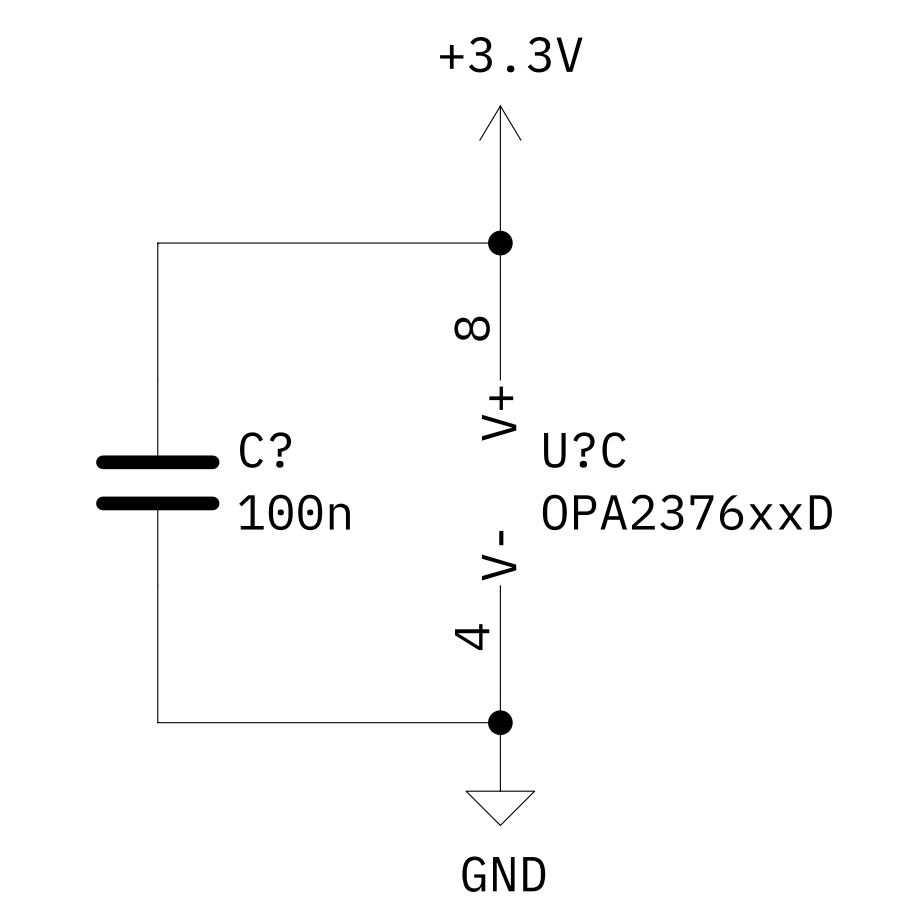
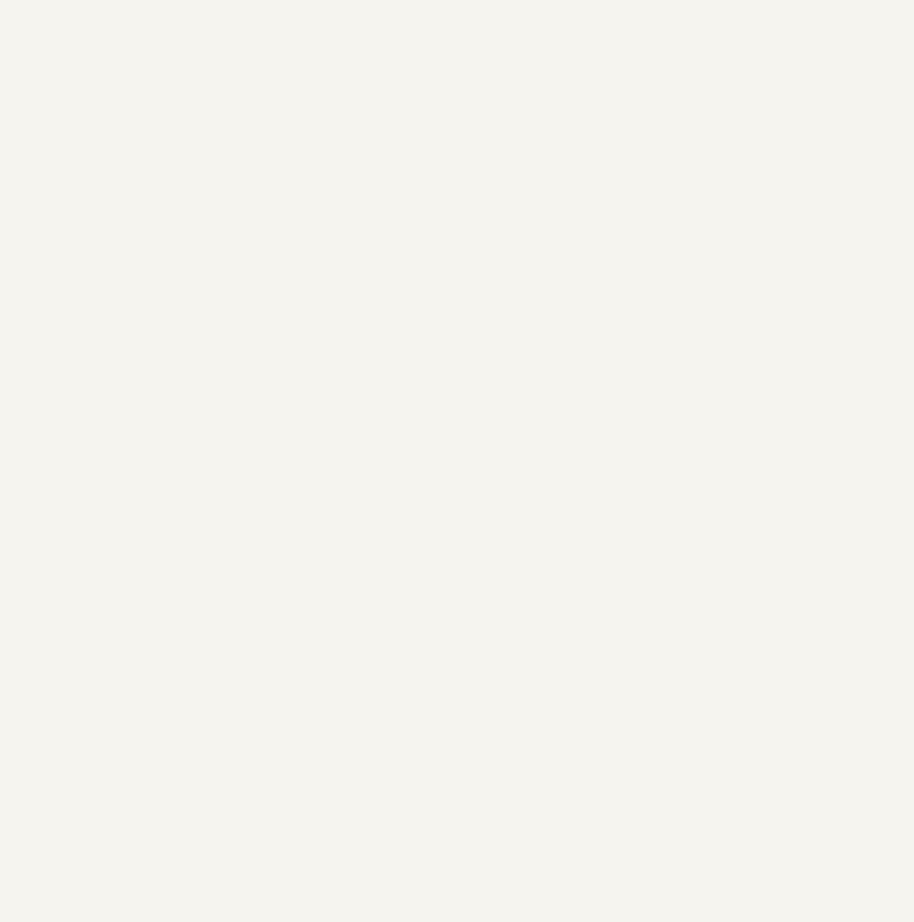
power symbol: +3.3V (500, 140) -> none
wire: (500, 174) (500, 277) -> none
wire: (500, 243) (157, 243) (157, 380) -> none
junction: (500, 243) -> none
C?: 100n (157, 482) -> none
U?C: OPA2376xxD (500, 482) -> none
wire: (157, 585) (157, 722) (500, 722) -> none
wire: (500, 688) (500, 756) -> none
junction: (500, 722) -> none
power symbol: GND (500, 791) -> none

